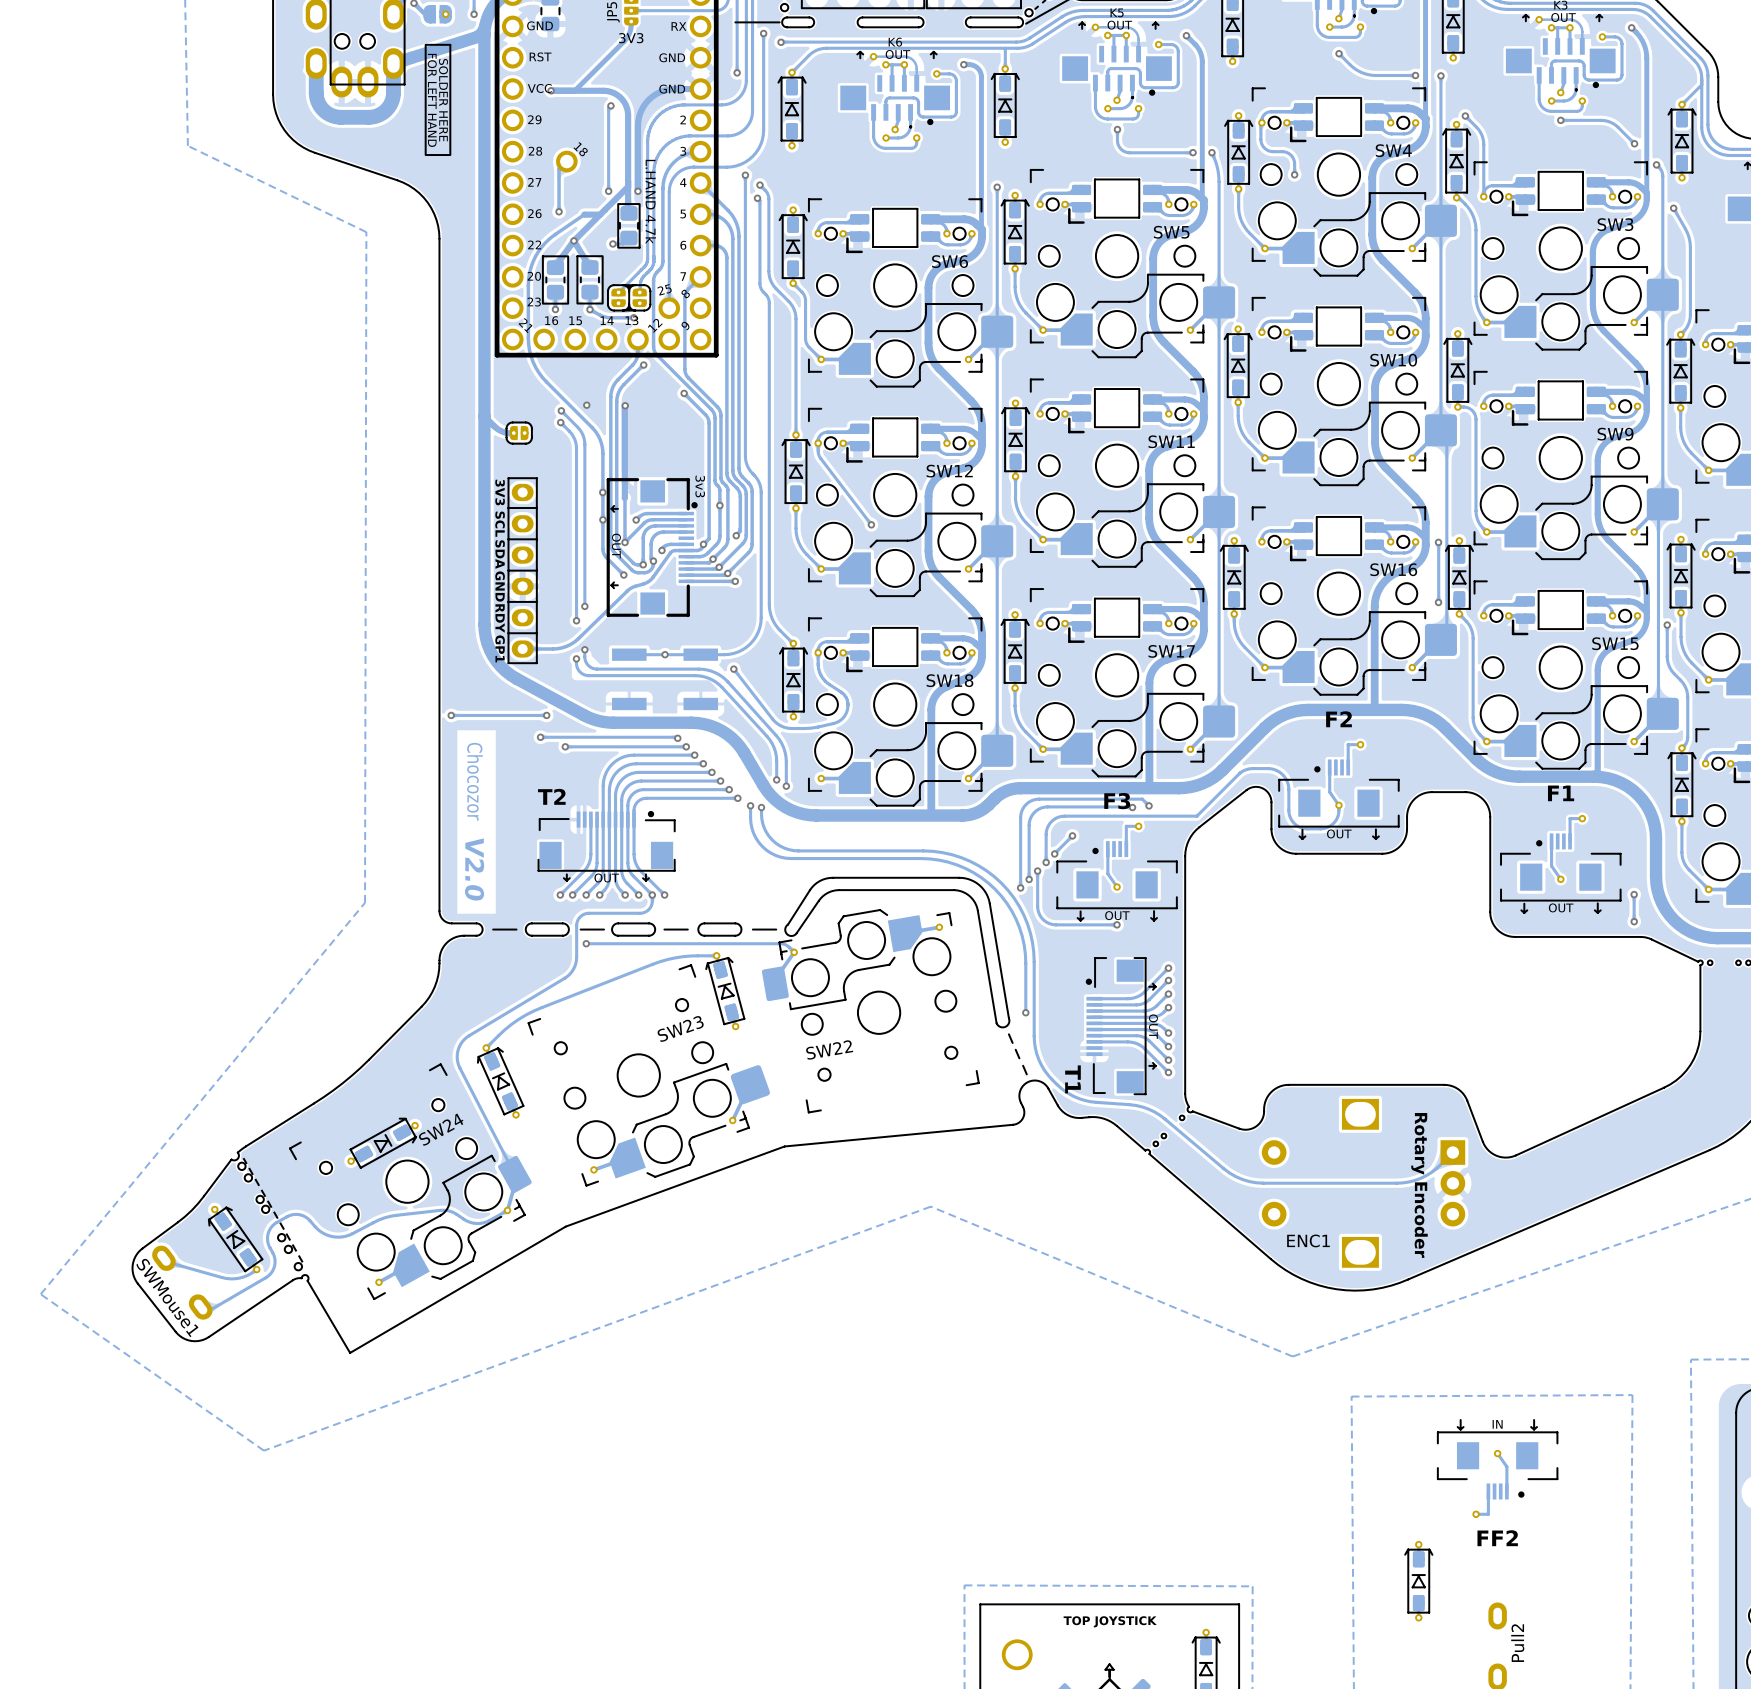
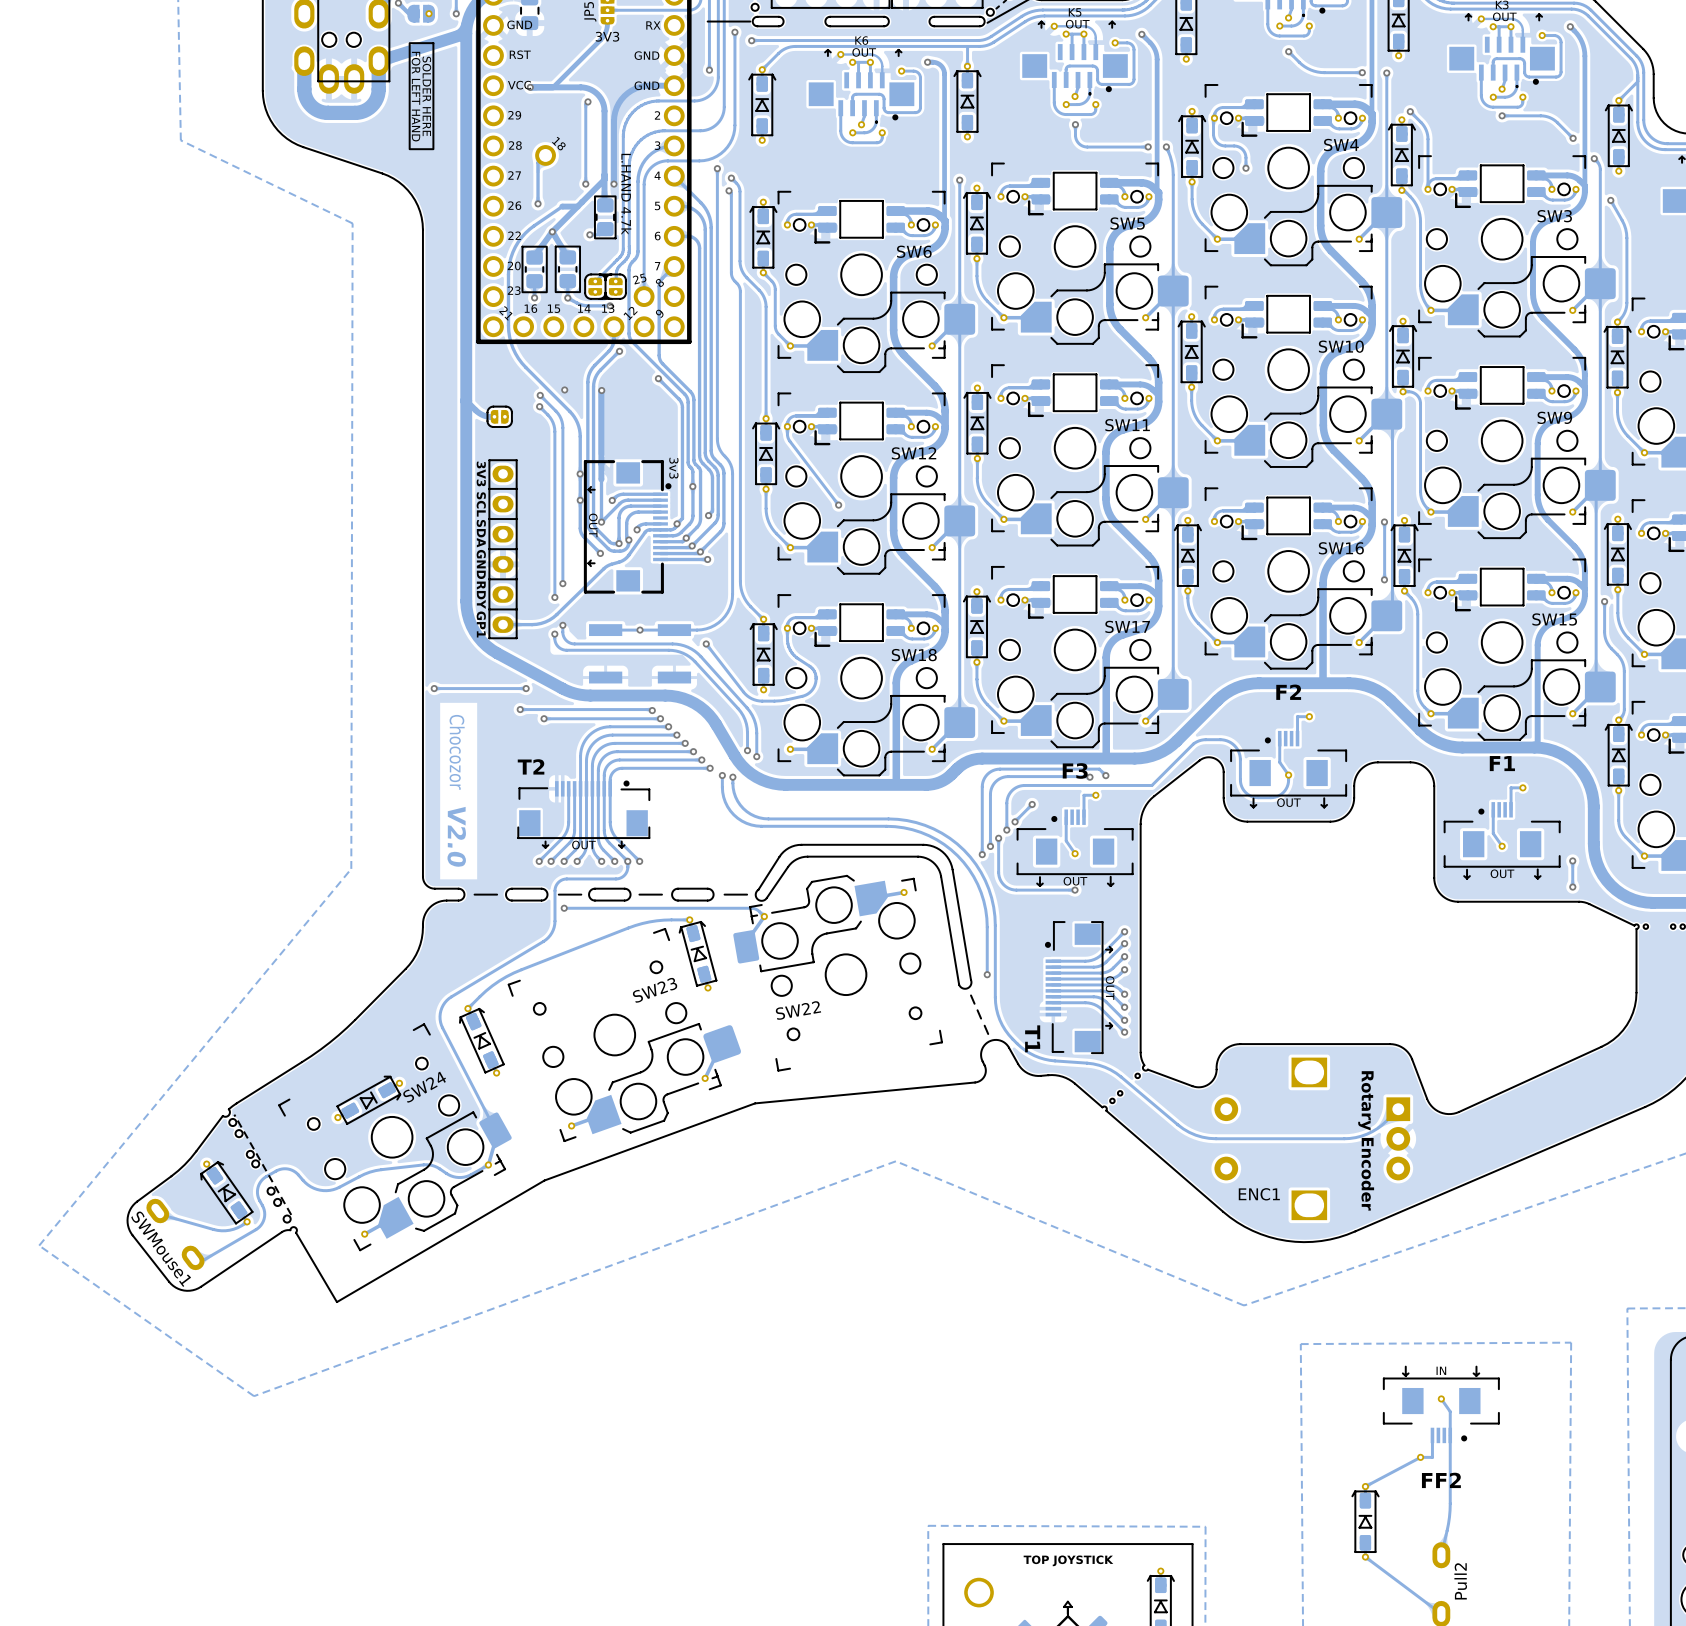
track: none -> (1450, 1435) (1450, 1510) (1441, 1555)
track: none -> (1420, 1457) (1365, 1486)
track: none -> (1365, 1557) (1441, 1613)

